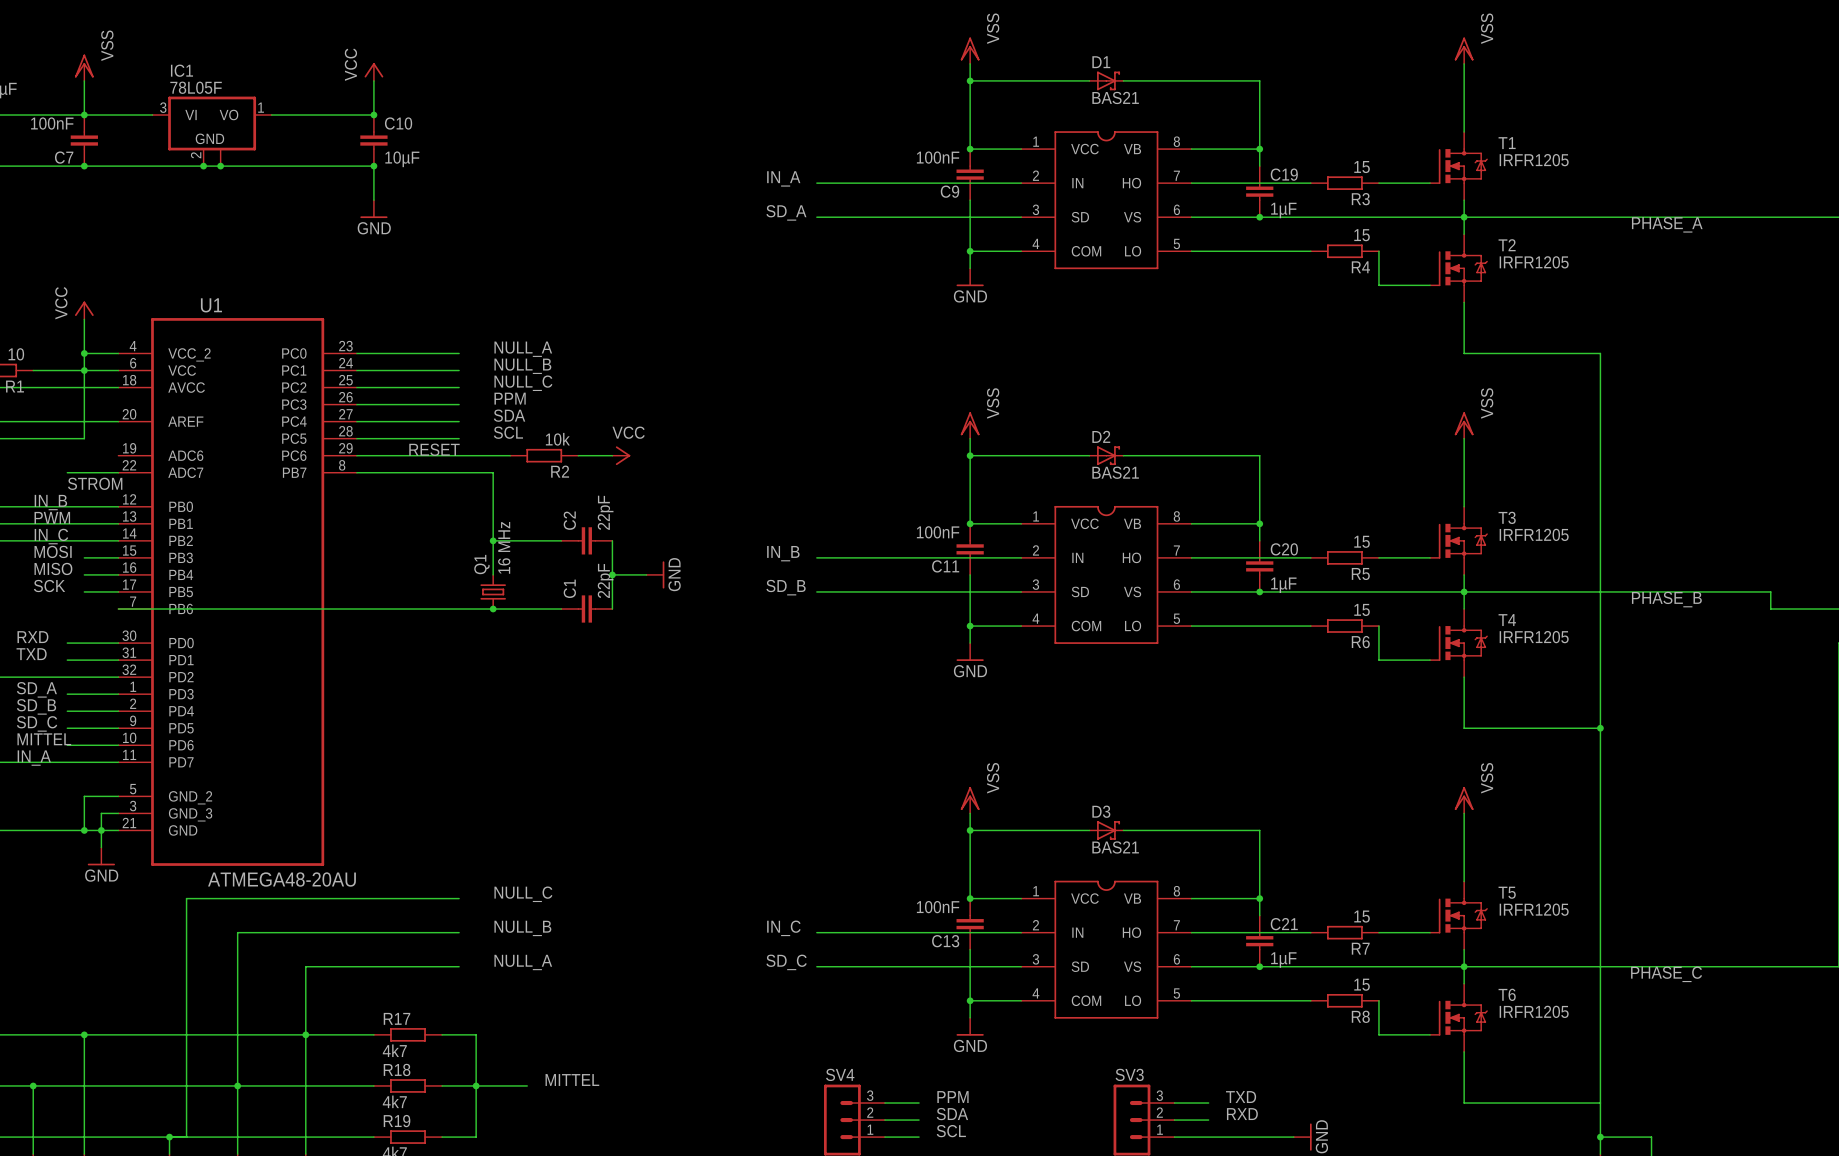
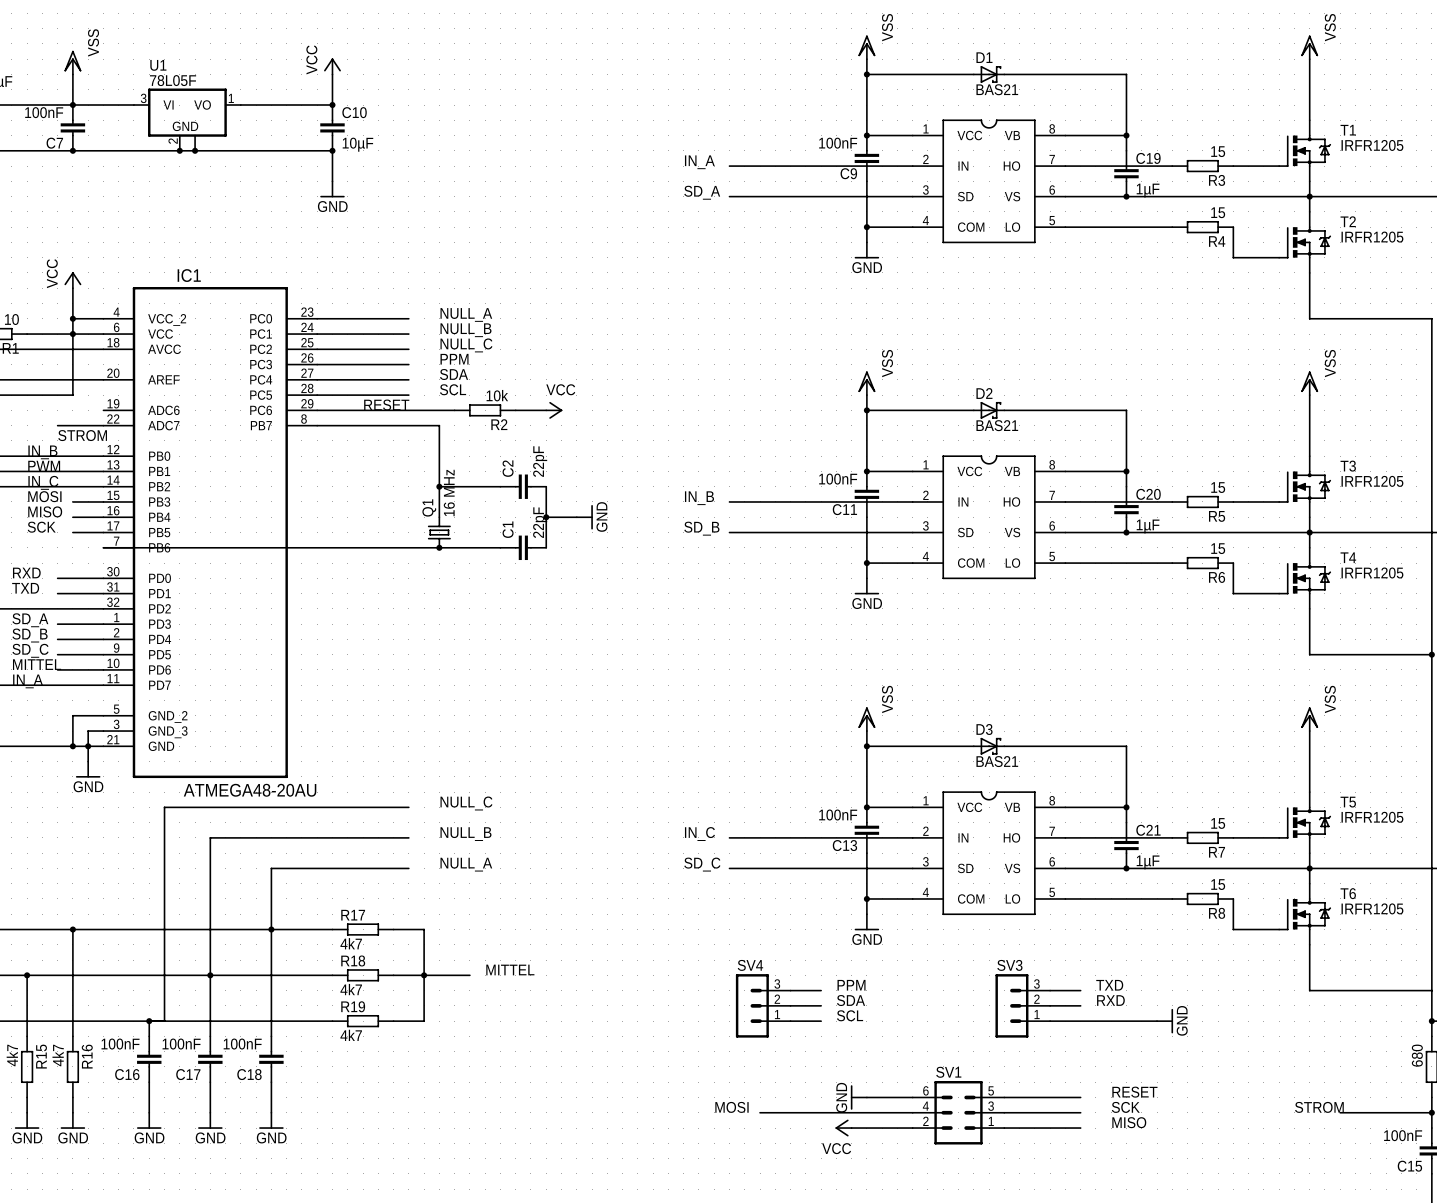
IC1 name: IC1 (181, 70) -> U1 (158, 65)
U1 name: U1 (211, 305) -> IC1 (189, 275)

